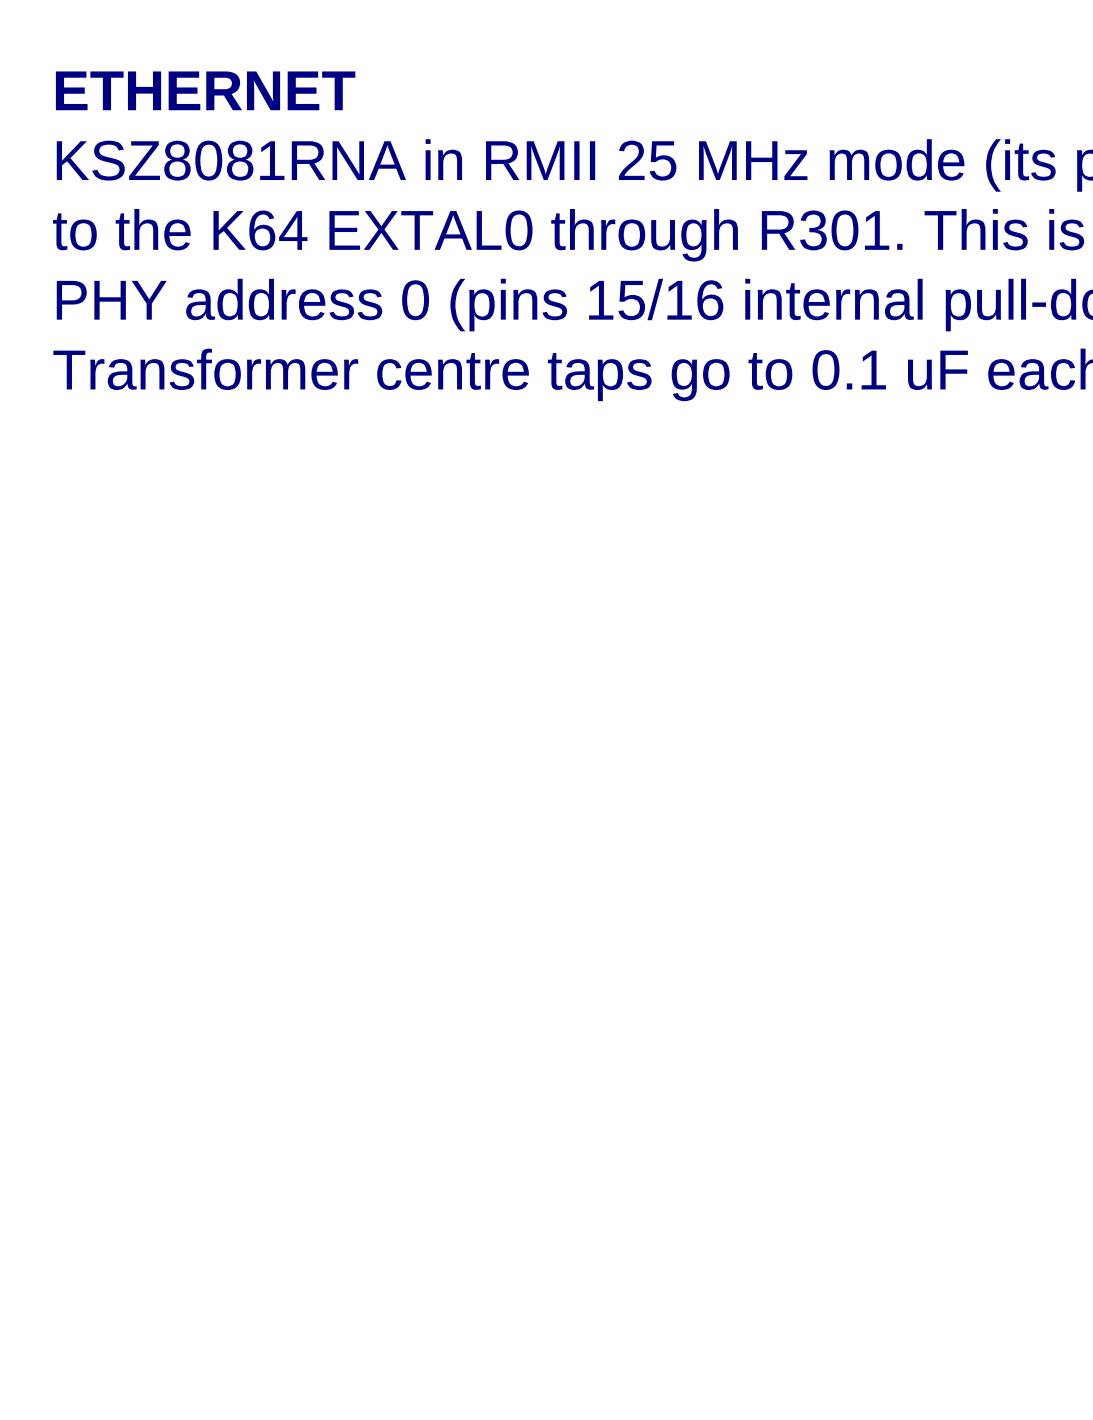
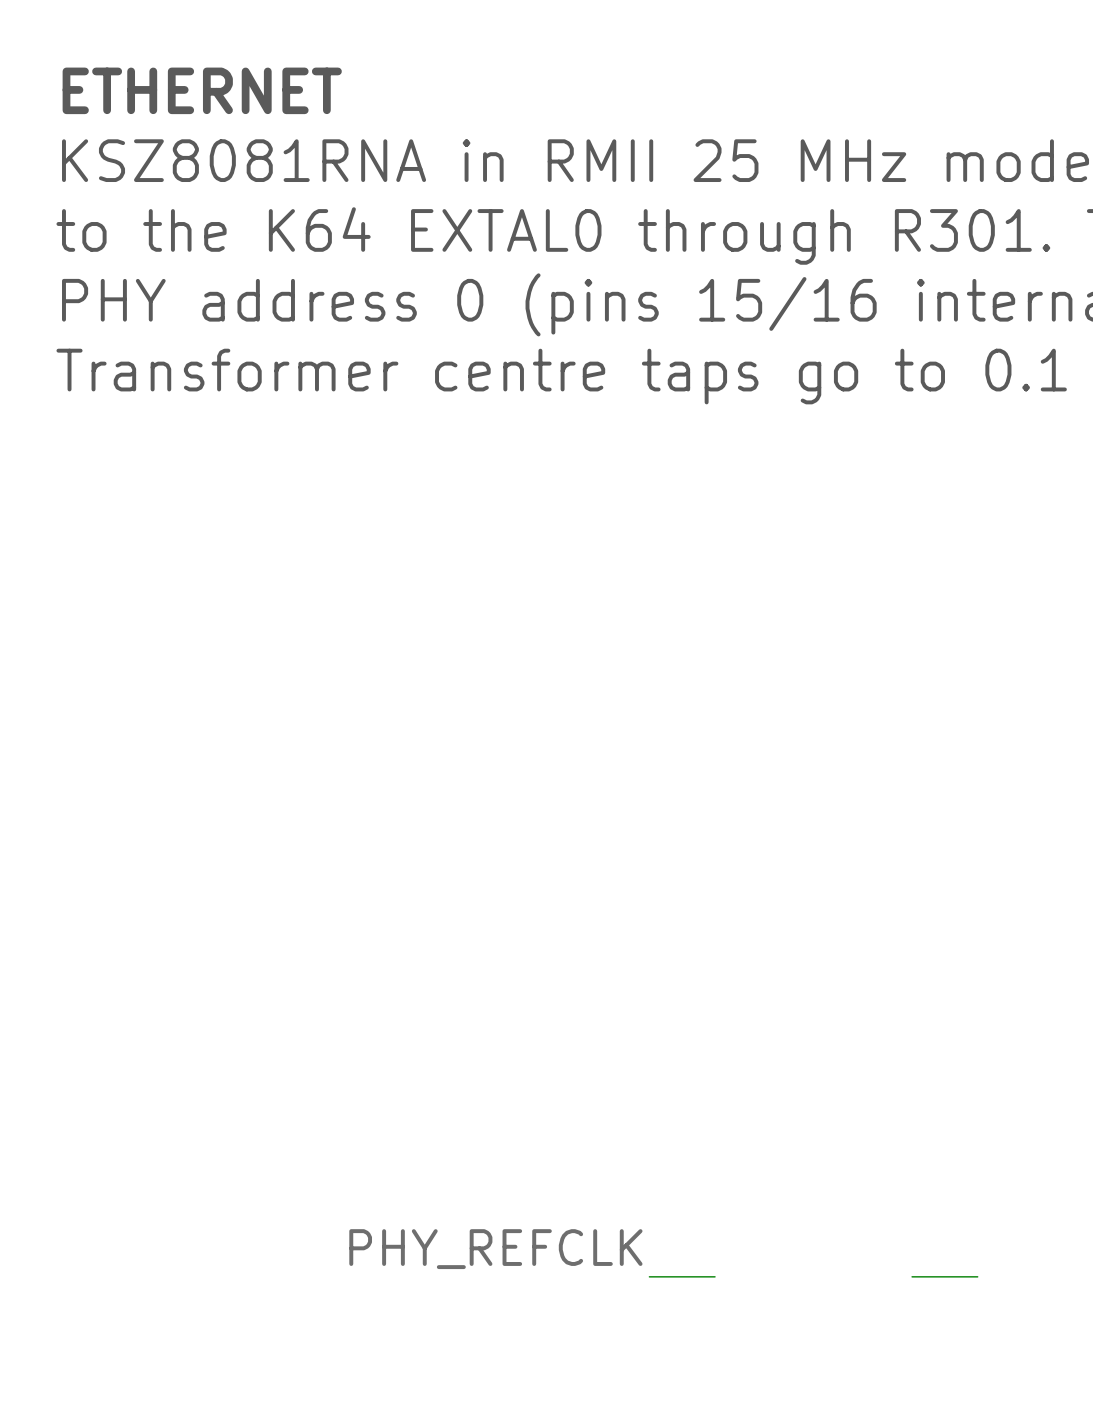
label: none -> PHY_REFCLK (495, 1249)
wire: none -> (649, 1276) (715, 1276)
wire: none -> (912, 1276) (977, 1276)

